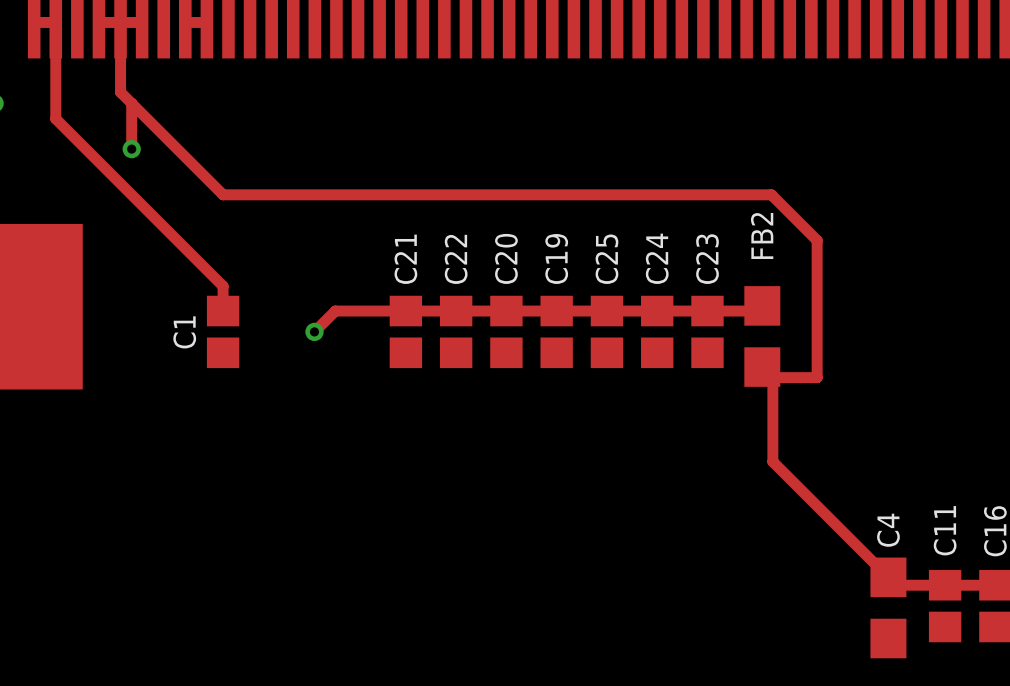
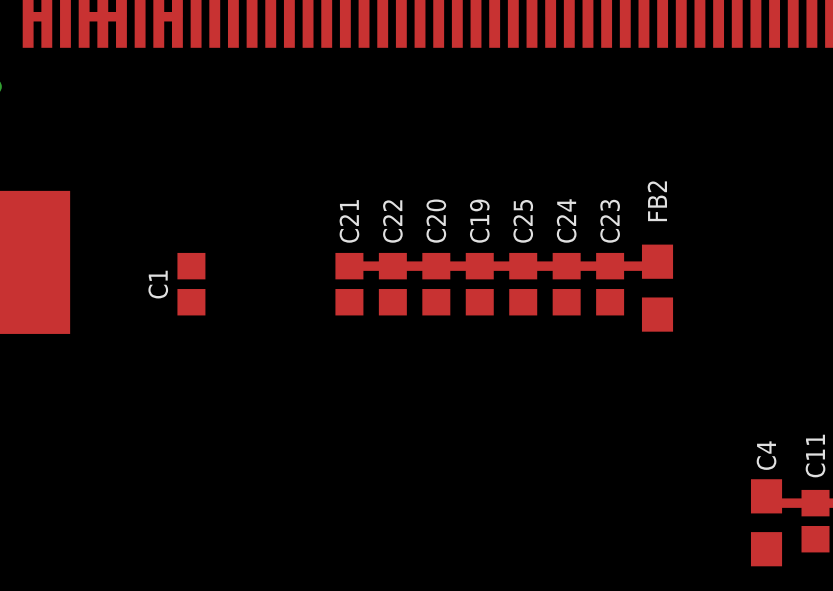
track: (55, 22) (55, 118) (223, 286) (223, 311) -> none
track: (120, 22) (120, 92) (223, 194) (771, 194) (817, 240) (817, 377) (772, 377) -> none
track: (131, 103) (131, 149) -> none
via: (131, 149) -> none
track: (405, 311) (335, 311) (314, 331) -> none
via: (314, 331) -> none
track: (772, 377) (772, 461) (888, 577) -> none

